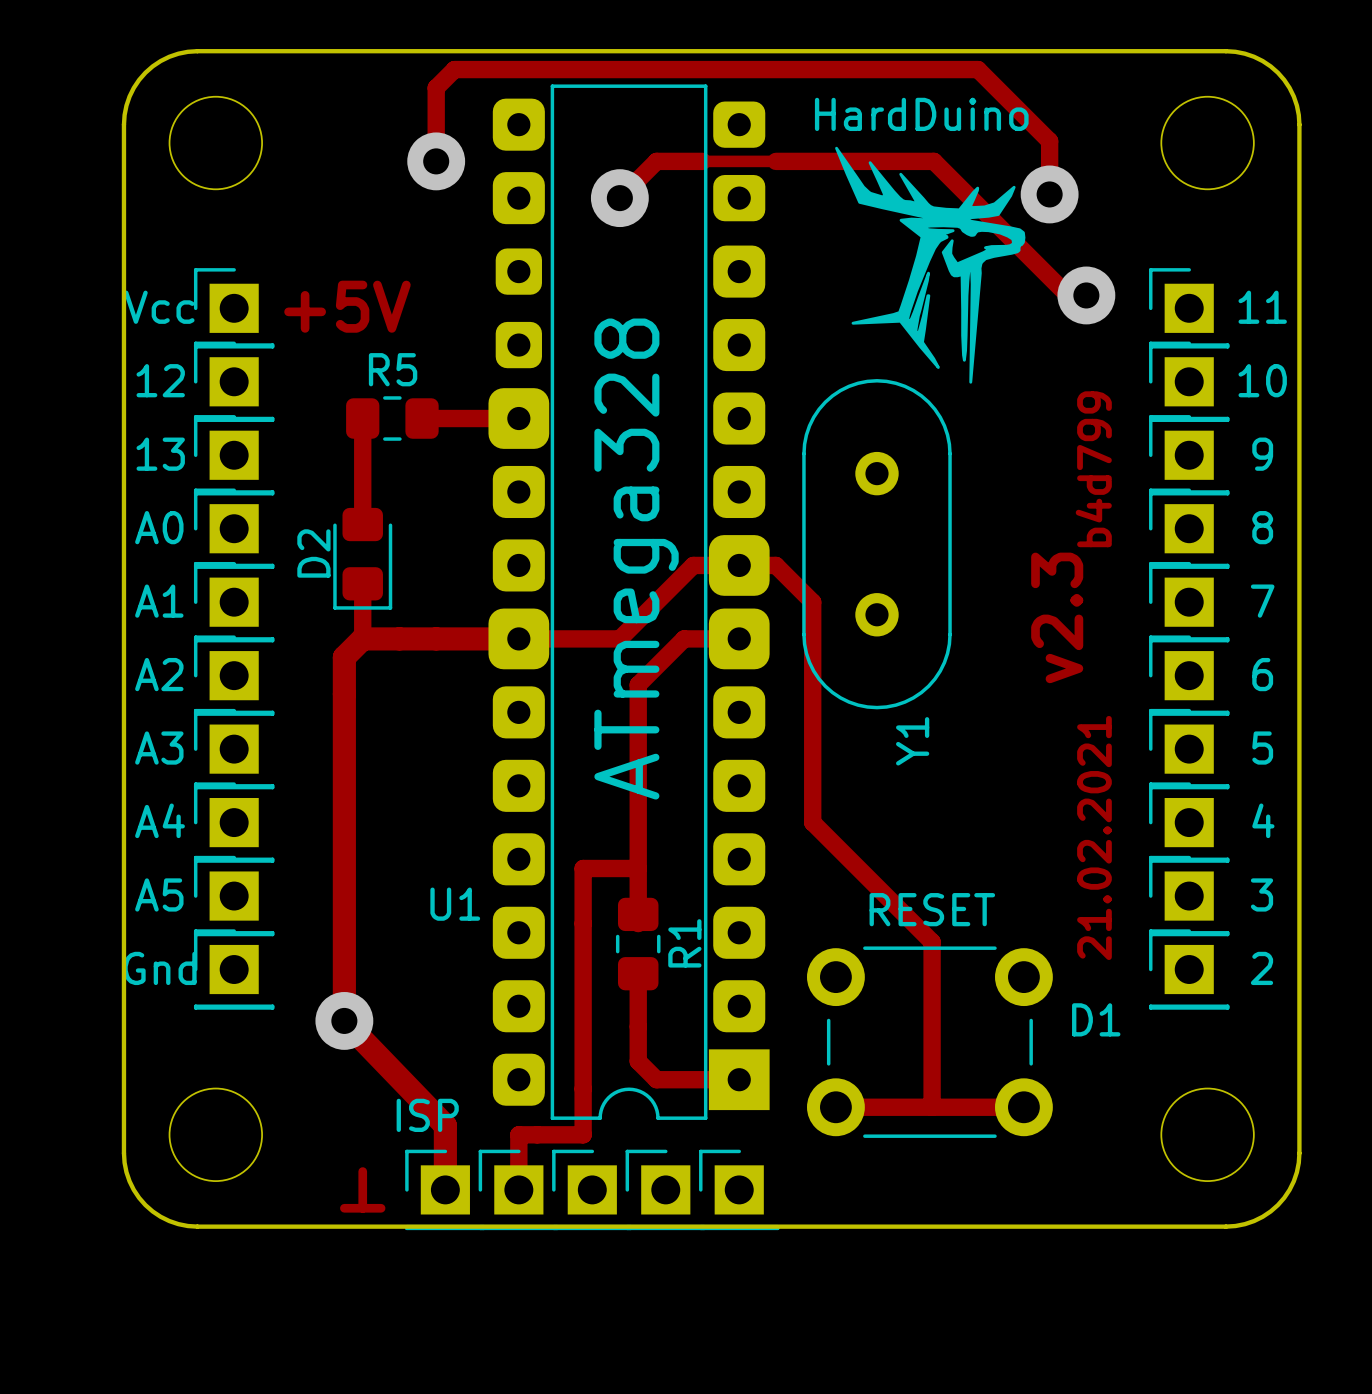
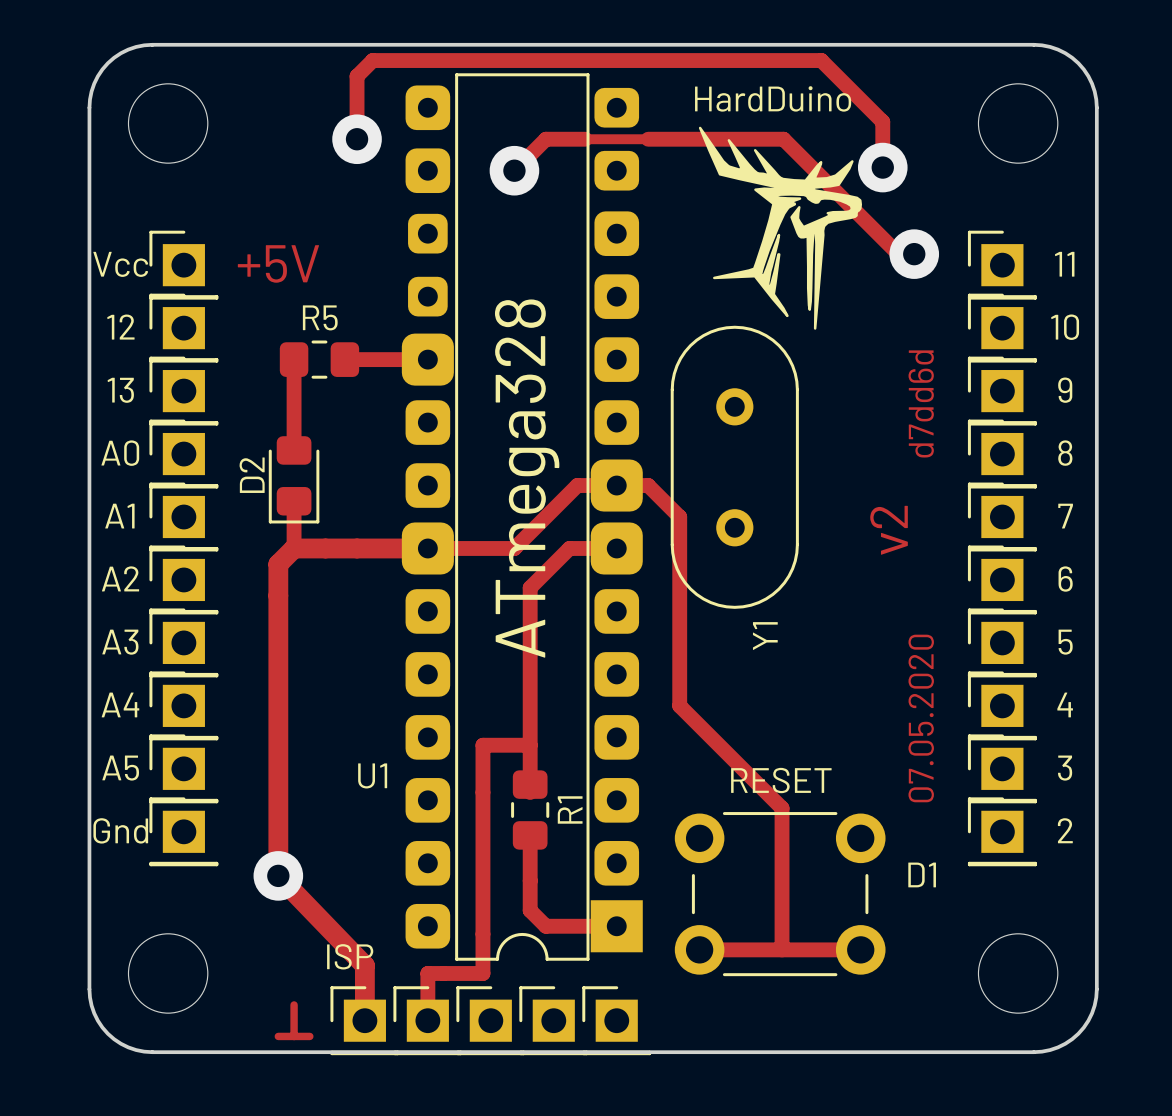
text: b4d799 (1093, 469) -> d7dd6d (921, 403)
text: v2.3 (1057, 617) -> v2 (889, 530)
text: 21.02.2021 (1094, 837) -> 07.05.2020 (921, 718)

